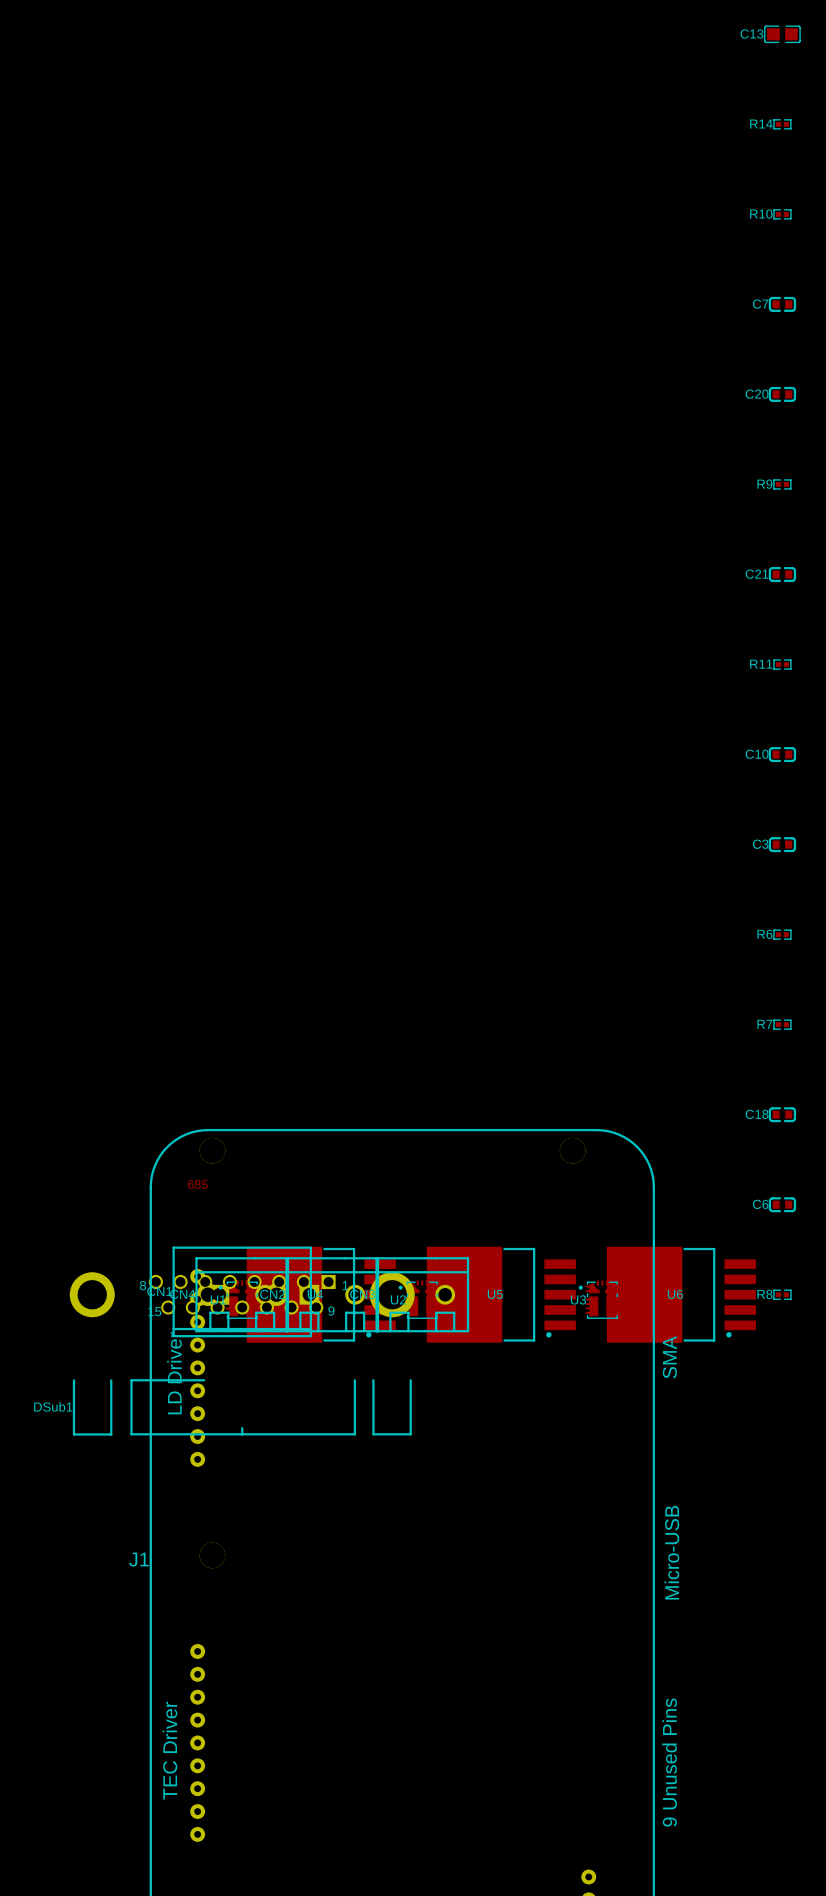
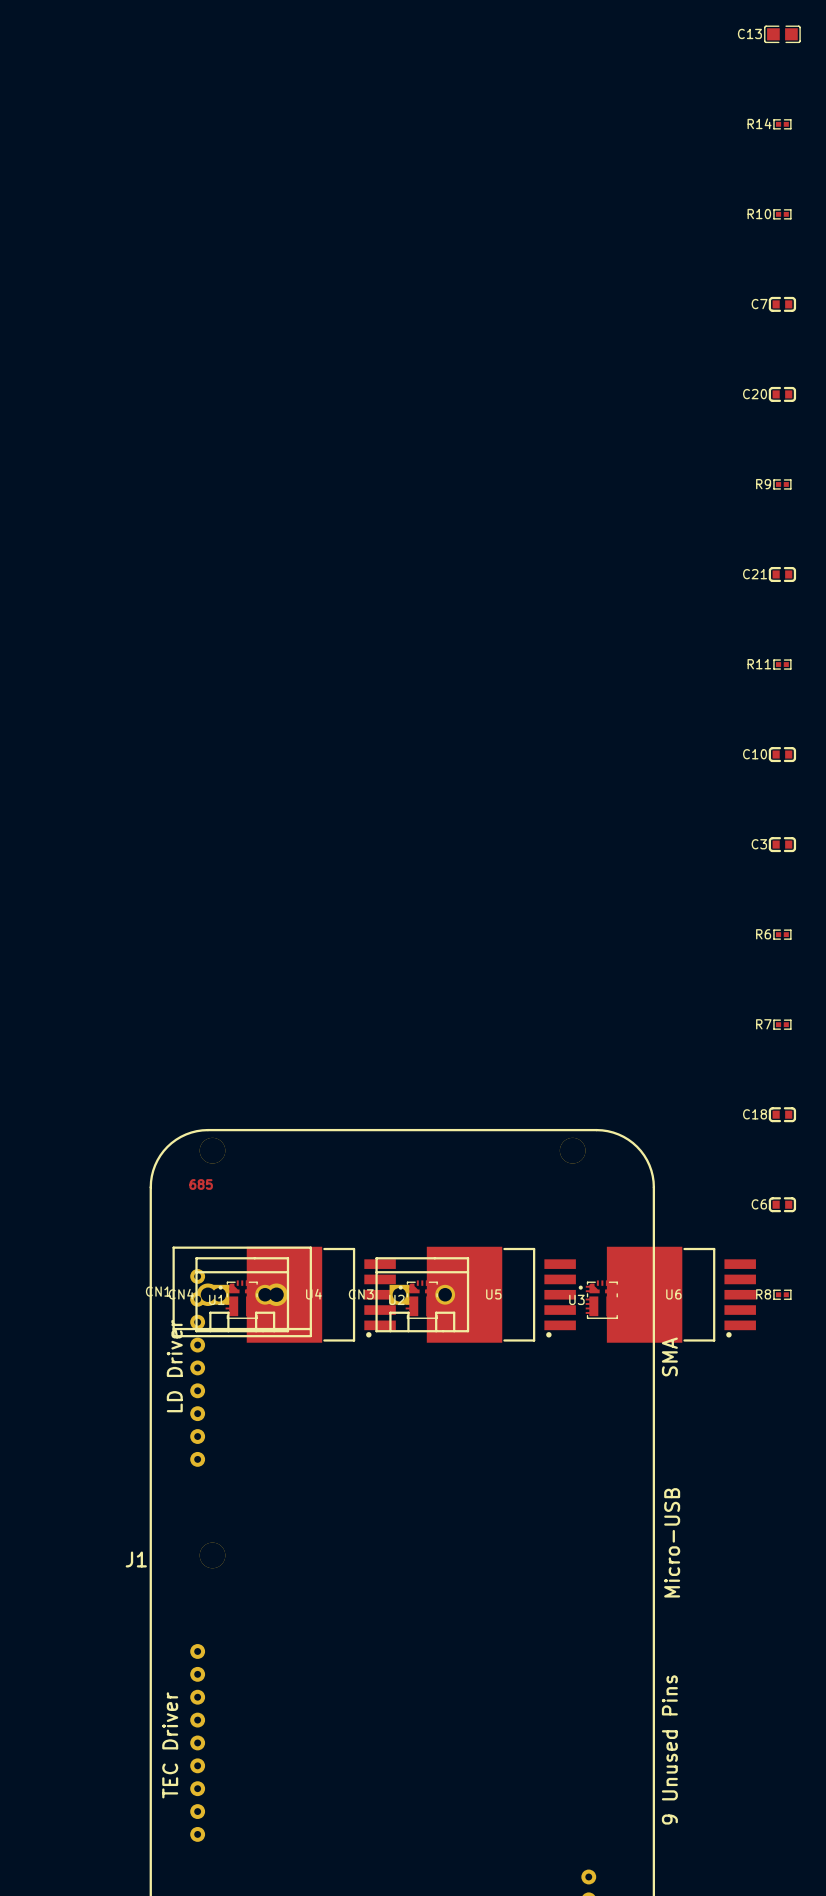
CN2: (332, 1294) -> none
DSub1: (242, 1353) -> none

